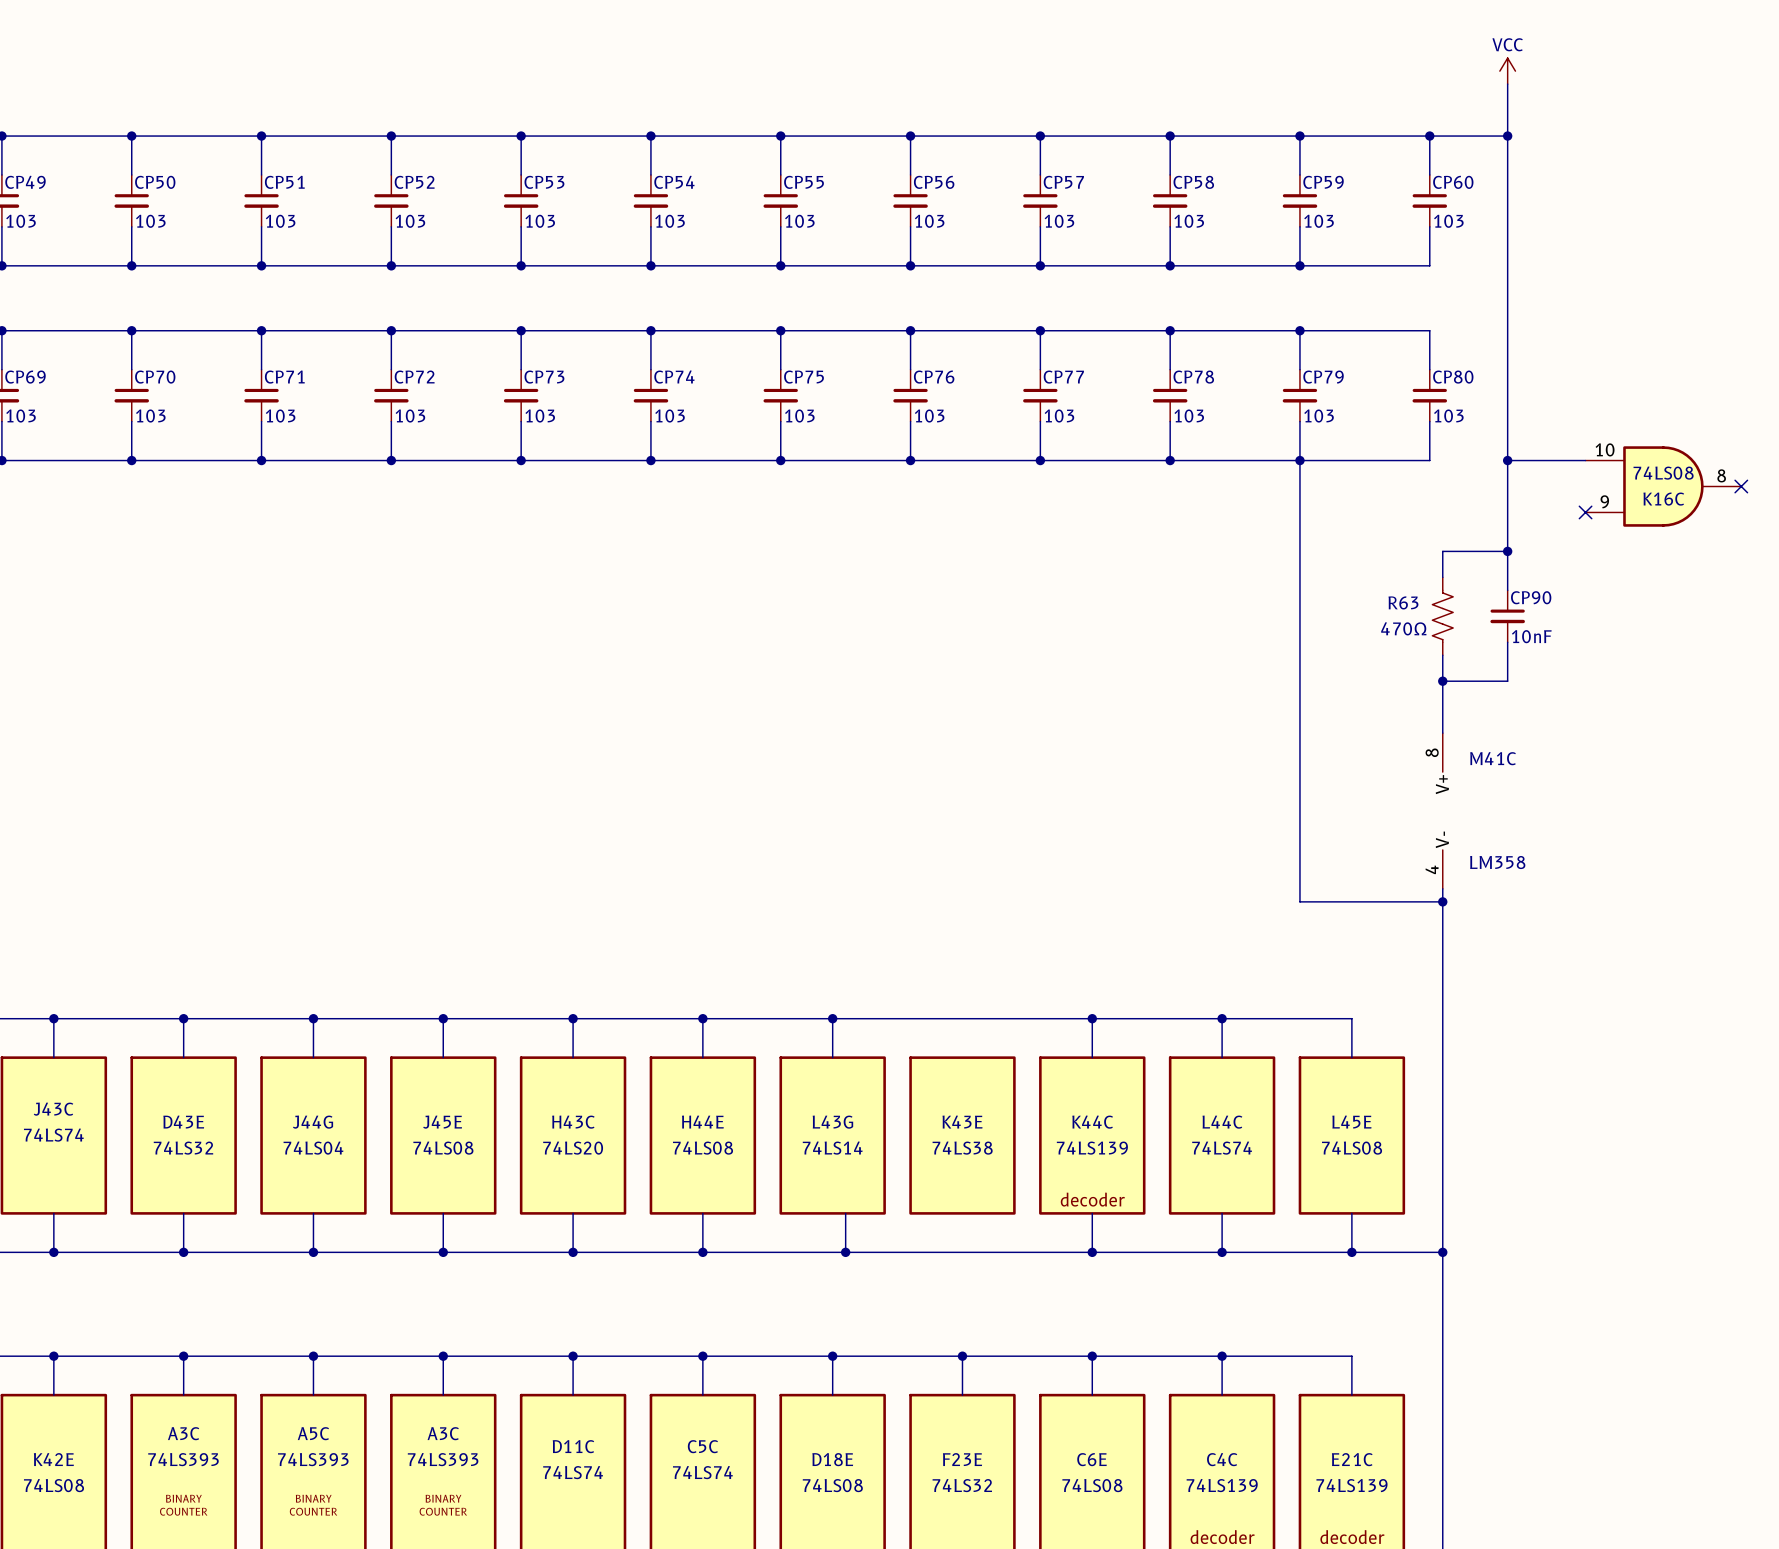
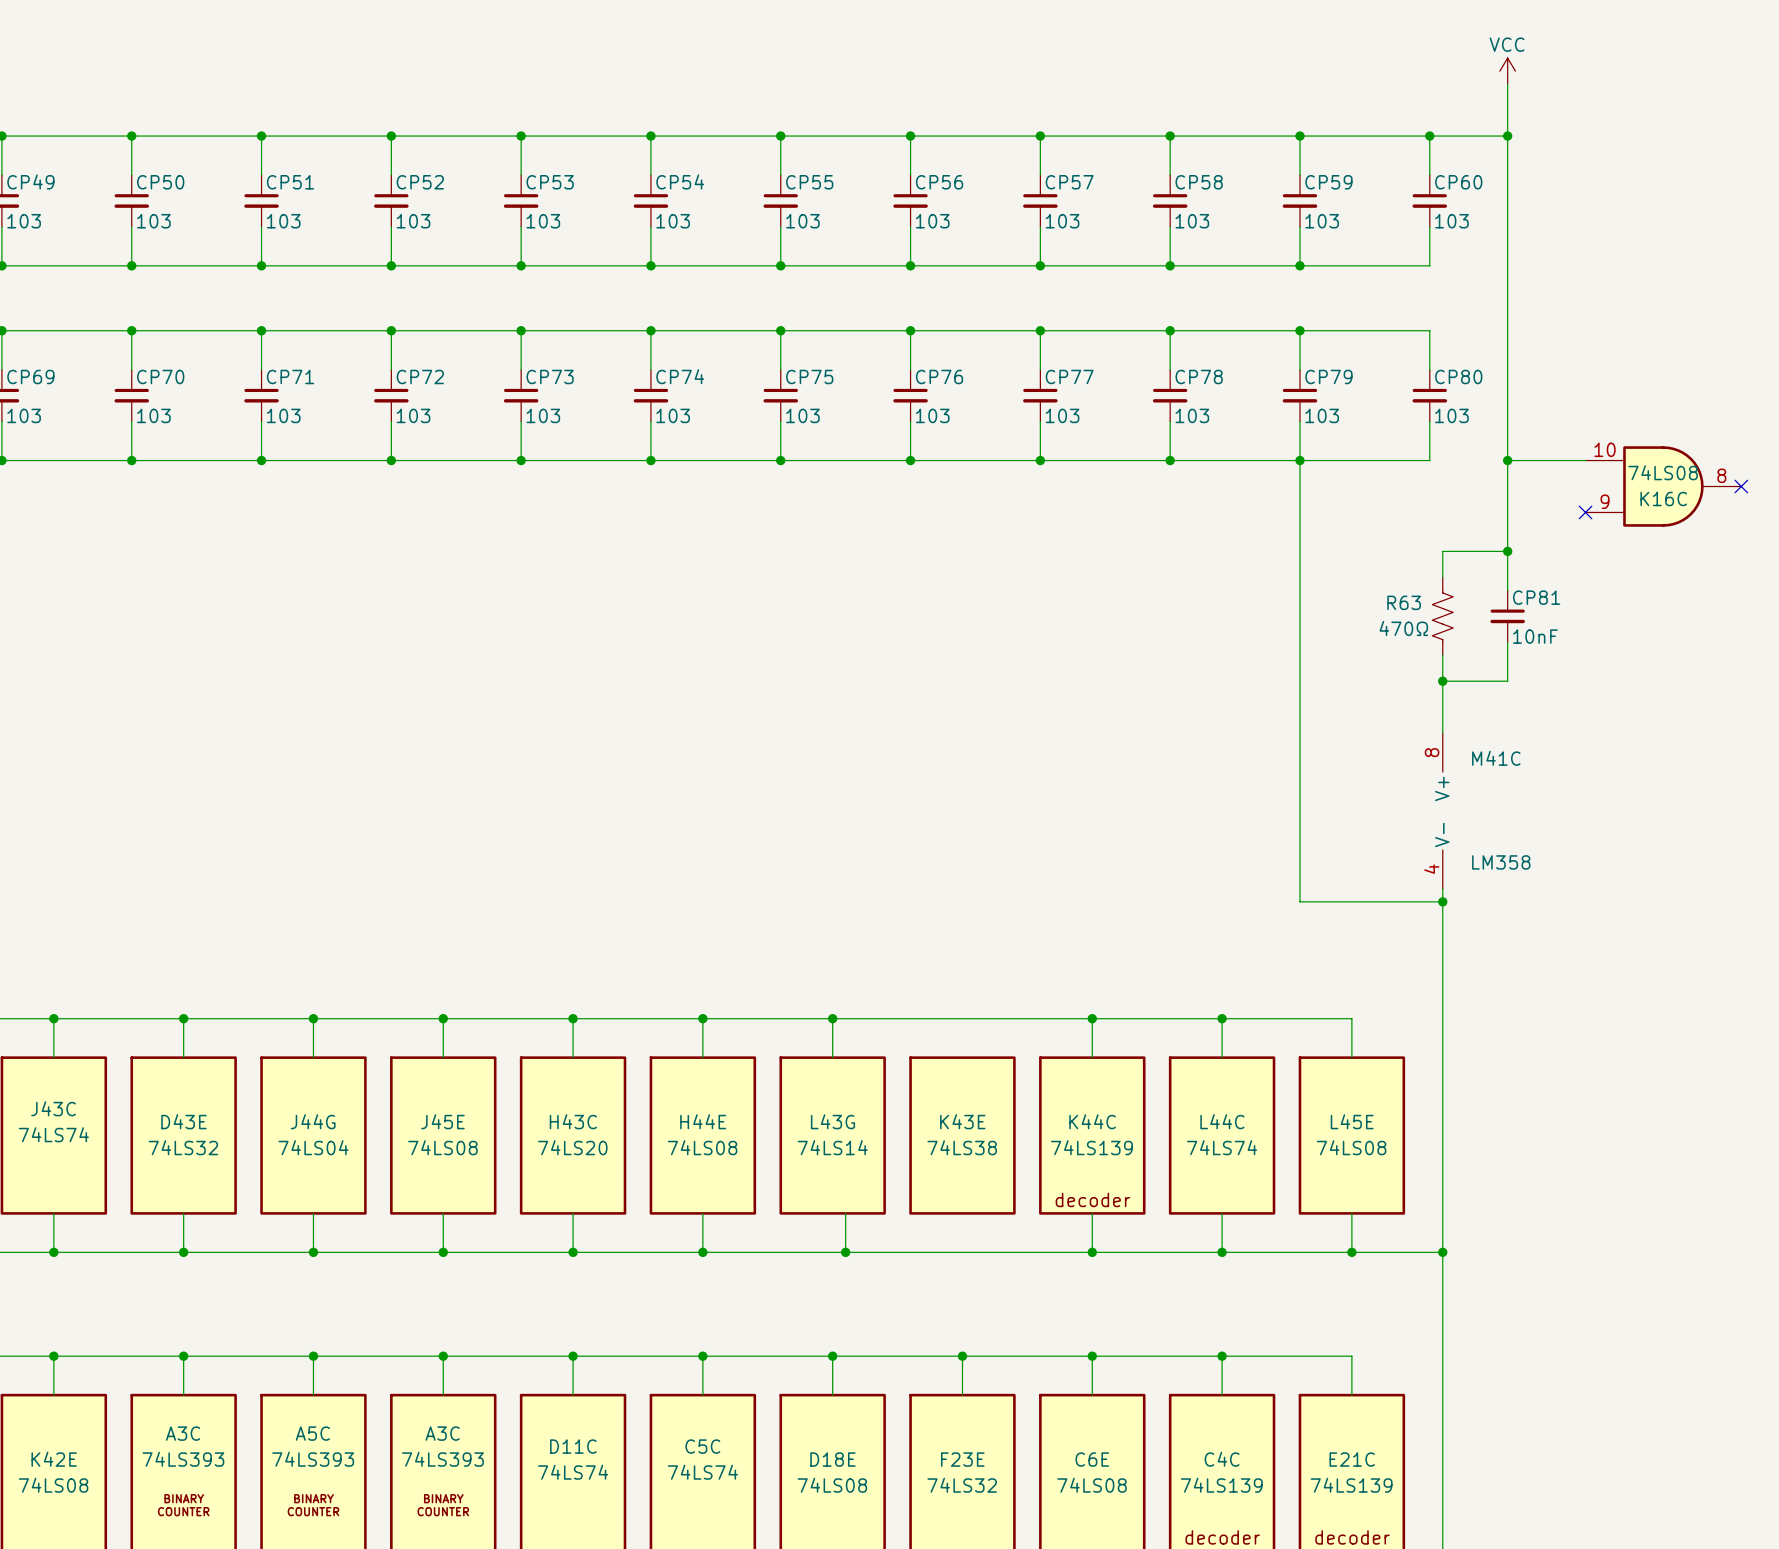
CP90 name: CP90 (1531, 597) -> CP81 (1536, 597)

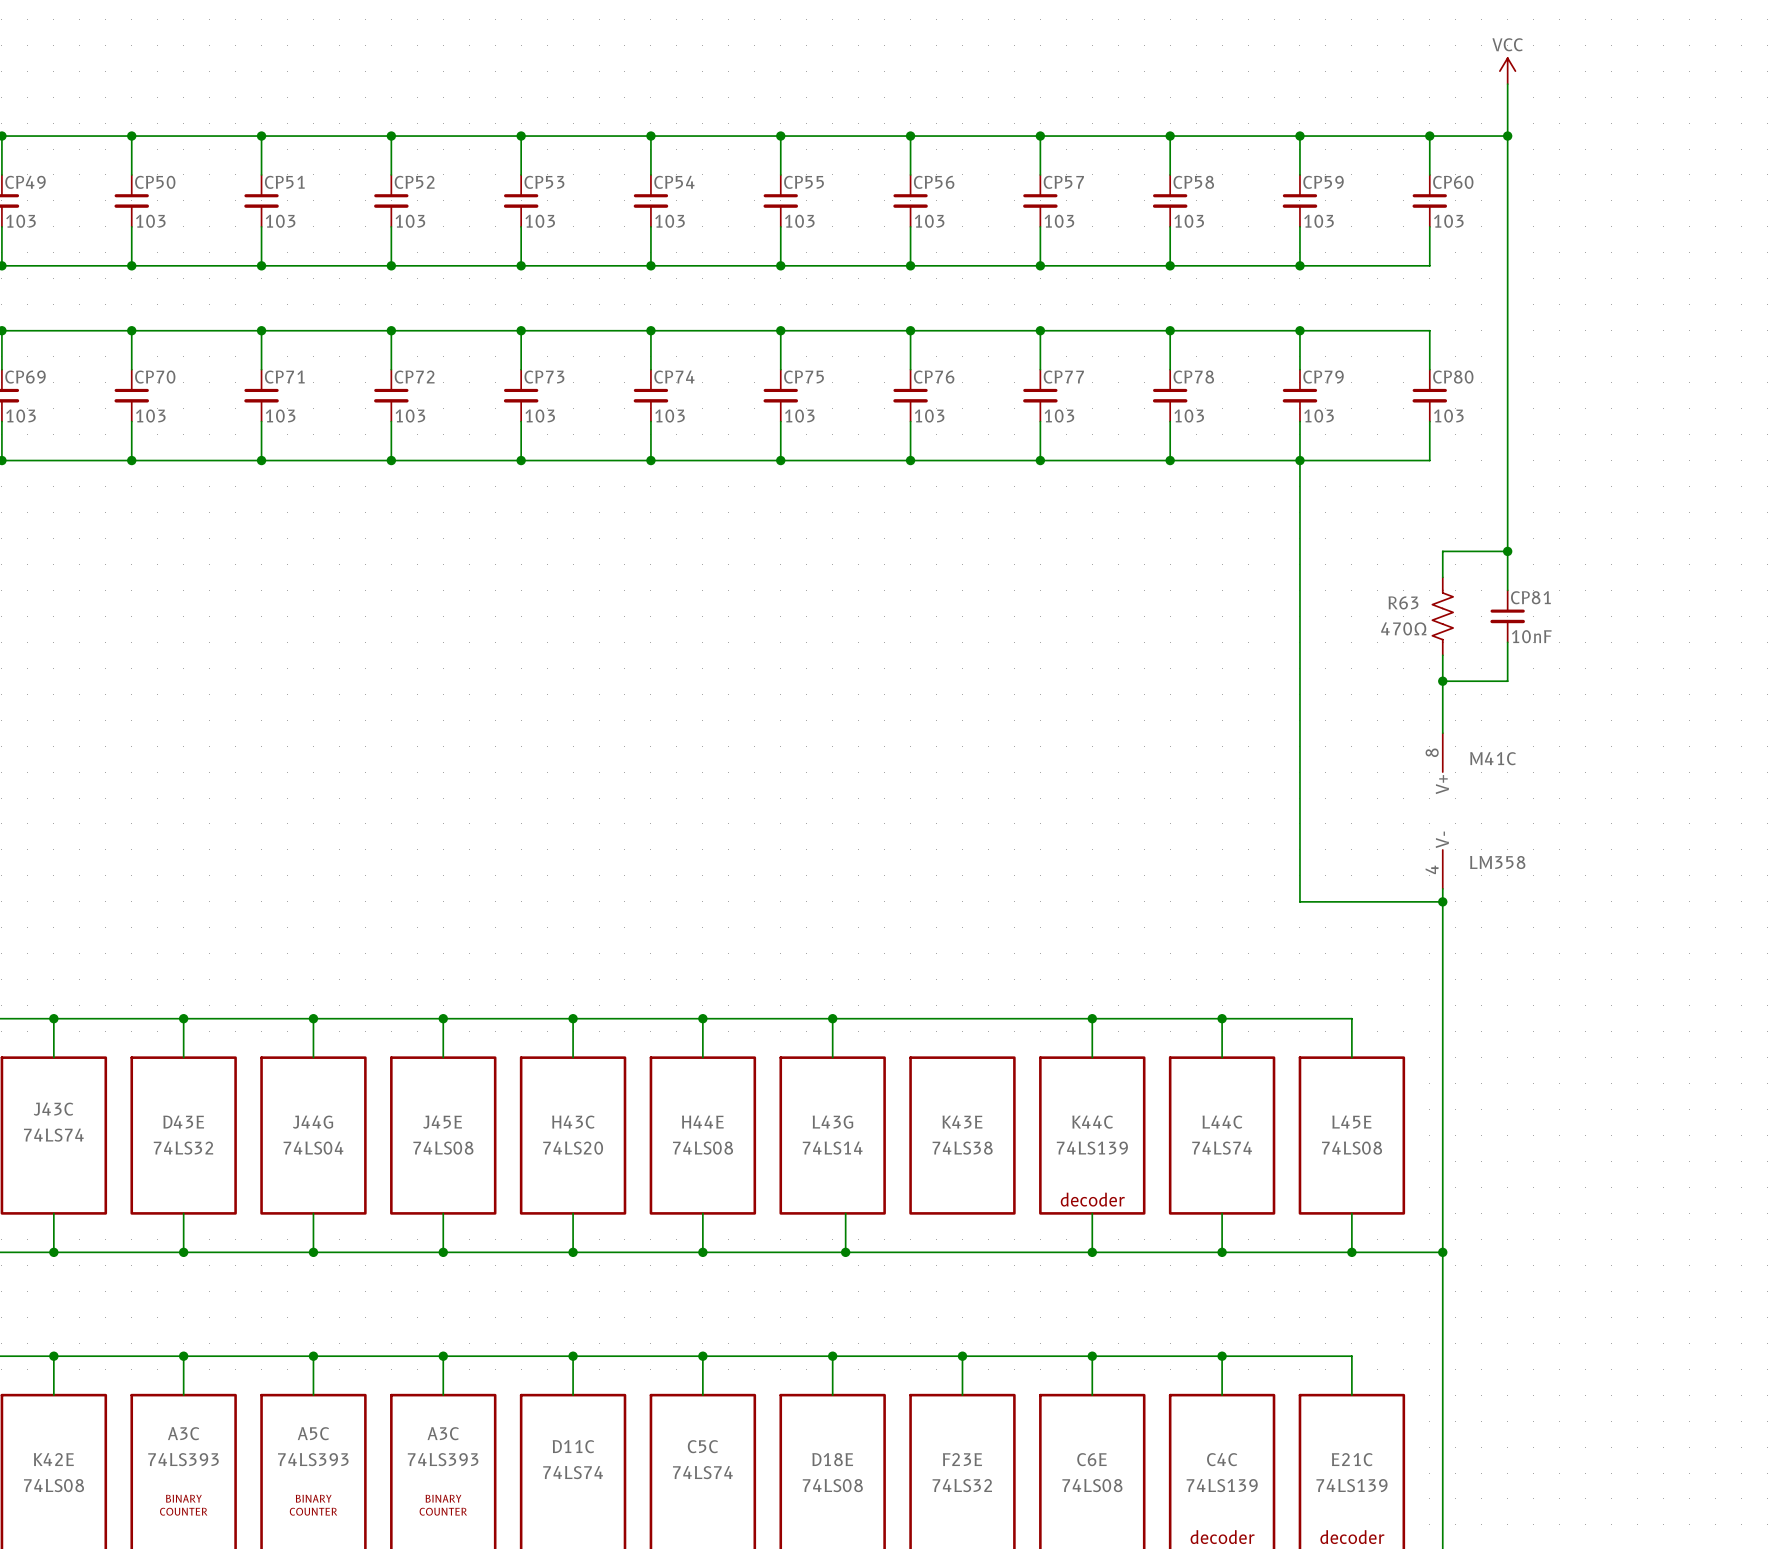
wire: (1507, 460) (1585, 460) -> none
junction: (1507, 460) -> none
K16C: 74LS08 (1663, 486) -> none
no-connect mark: (1741, 486) -> none
no-connect mark: (1585, 512) -> none

